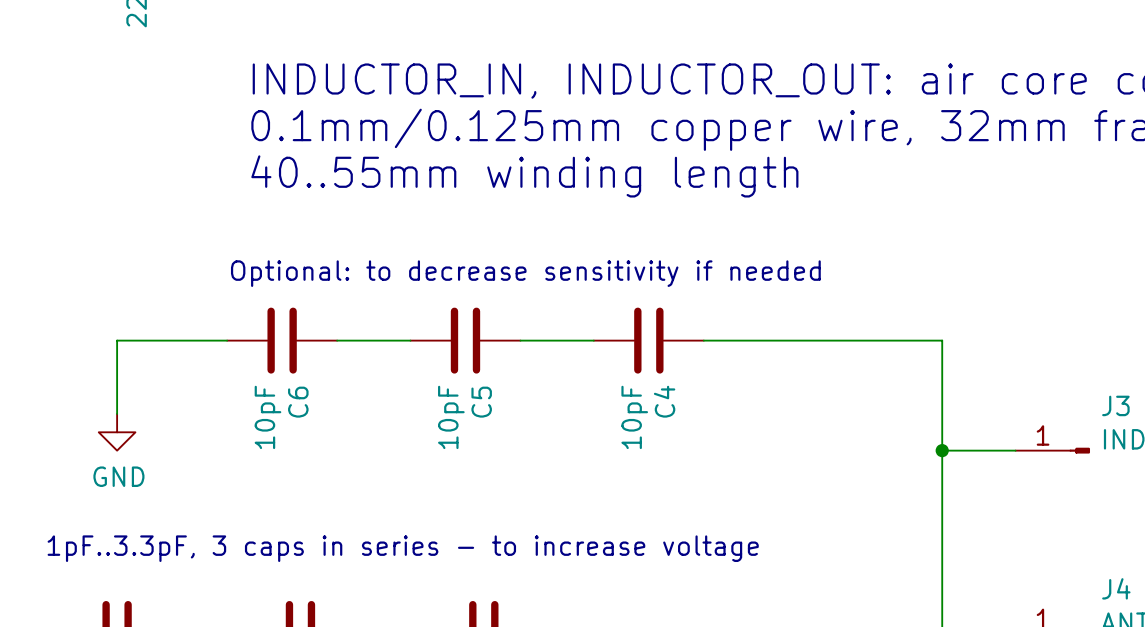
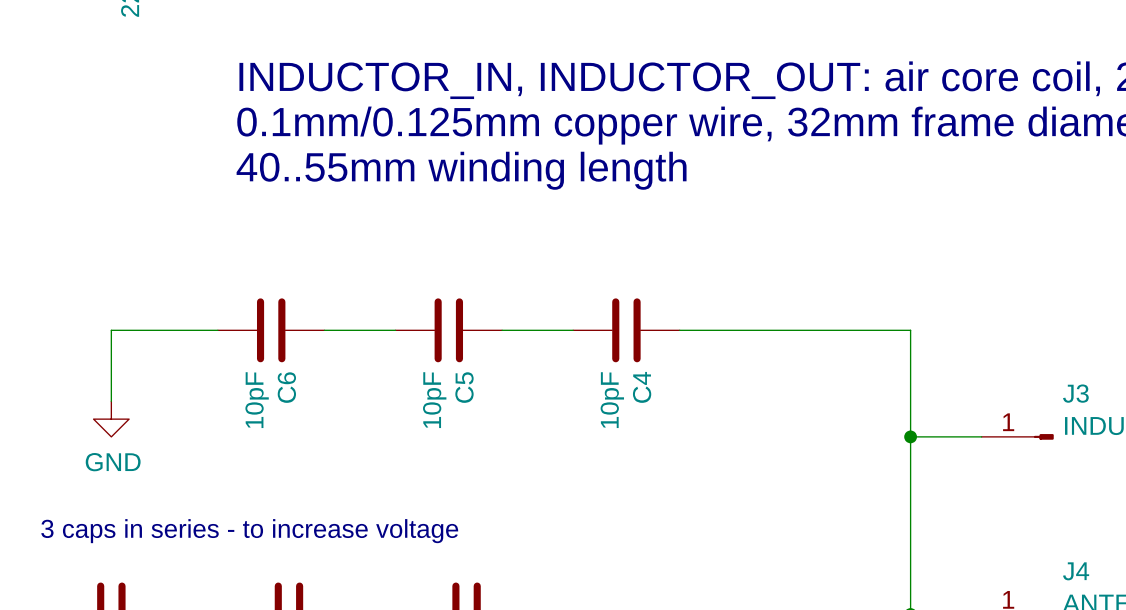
text: Optional: to decrease sensitivity if needed (525, 273) -> none
text: 1pF..3.3pF, 3 caps in series - to increase voltage (403, 548) -> 3 caps in series - to increase voltage (249, 531)

